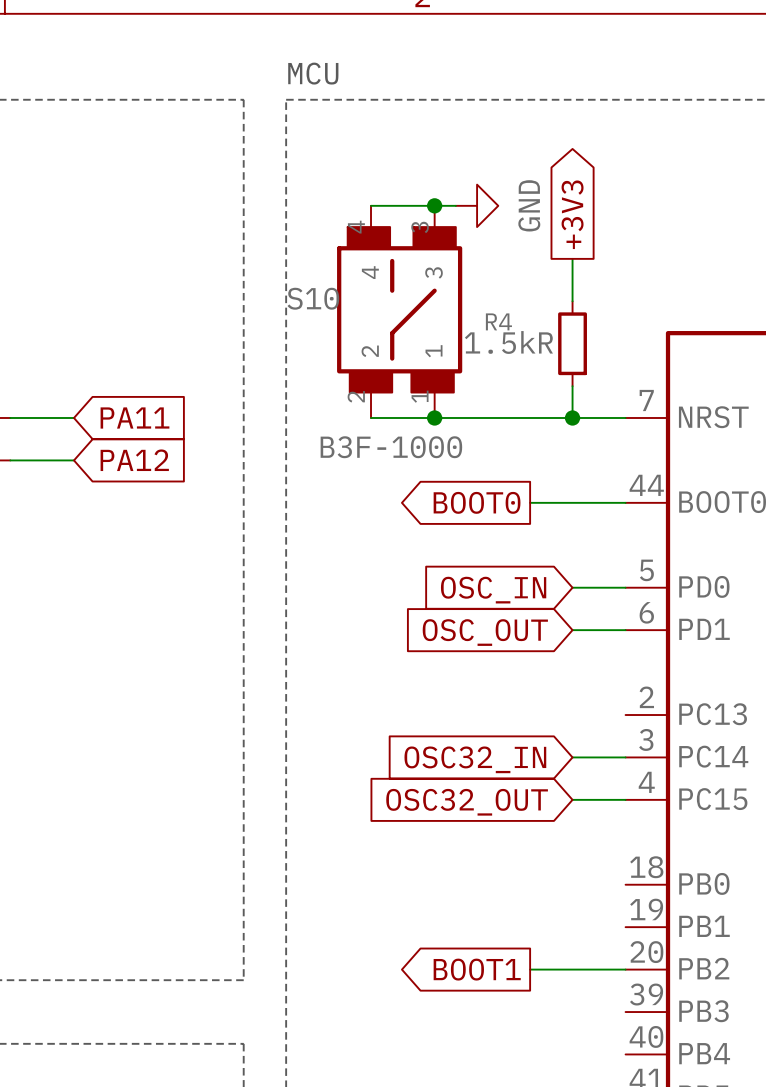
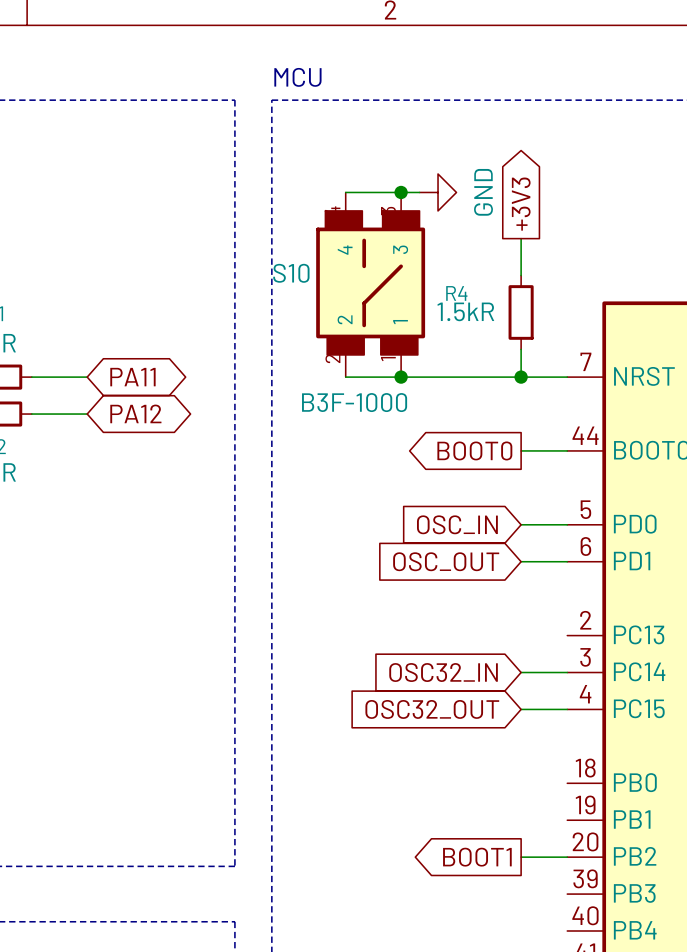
global label shape: input (134, 417) -> bidirectional (132, 377)
global label shape: input (134, 460) -> bidirectional (135, 413)
global label position: BOOT0 (477, 502) -> BOOT0 (474, 450)
wire: (530, 502) (572, 502) -> none
global label position: BOOT1 (477, 969) -> BOOT1 (477, 857)
wire: (530, 969) (572, 969) -> none

